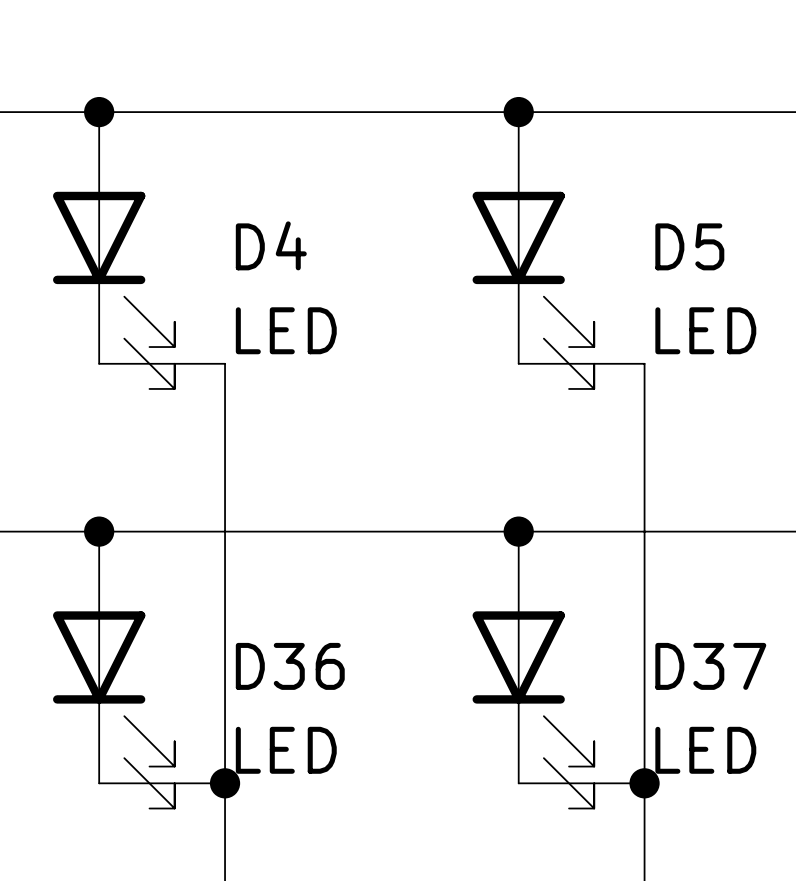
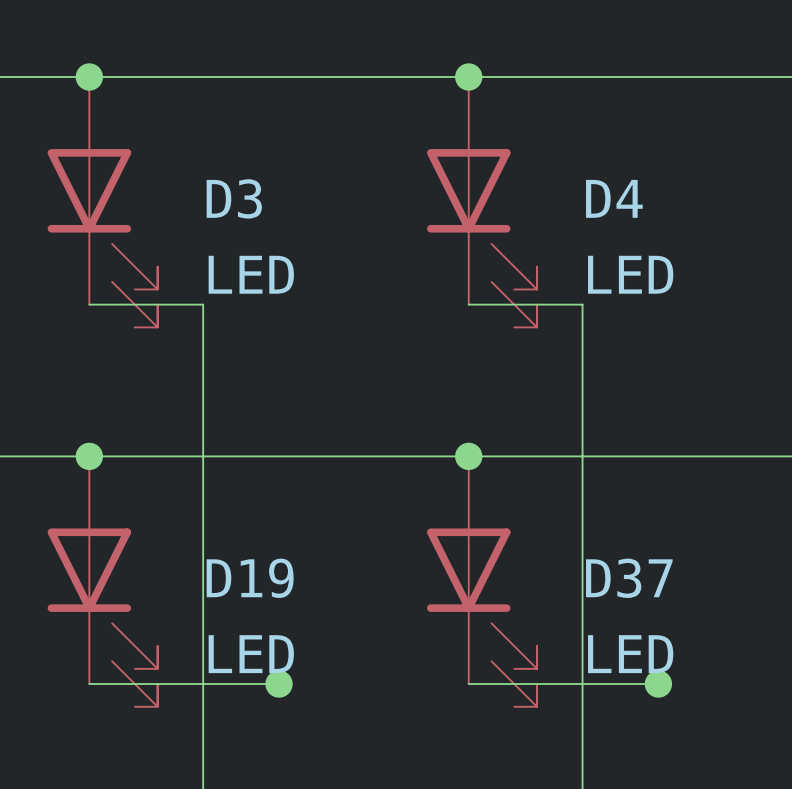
D4 name: D4 (271, 245) -> D3 (234, 198)
D5 name: D5 (689, 246) -> D4 (614, 198)
D36 name: D36 (290, 666) -> D19 (250, 578)
wire: none -> (203, 684) (279, 684)
junction position: (225, 783) -> (279, 684)
wire: none -> (582, 684) (658, 684)
junction position: (644, 783) -> (658, 684)

